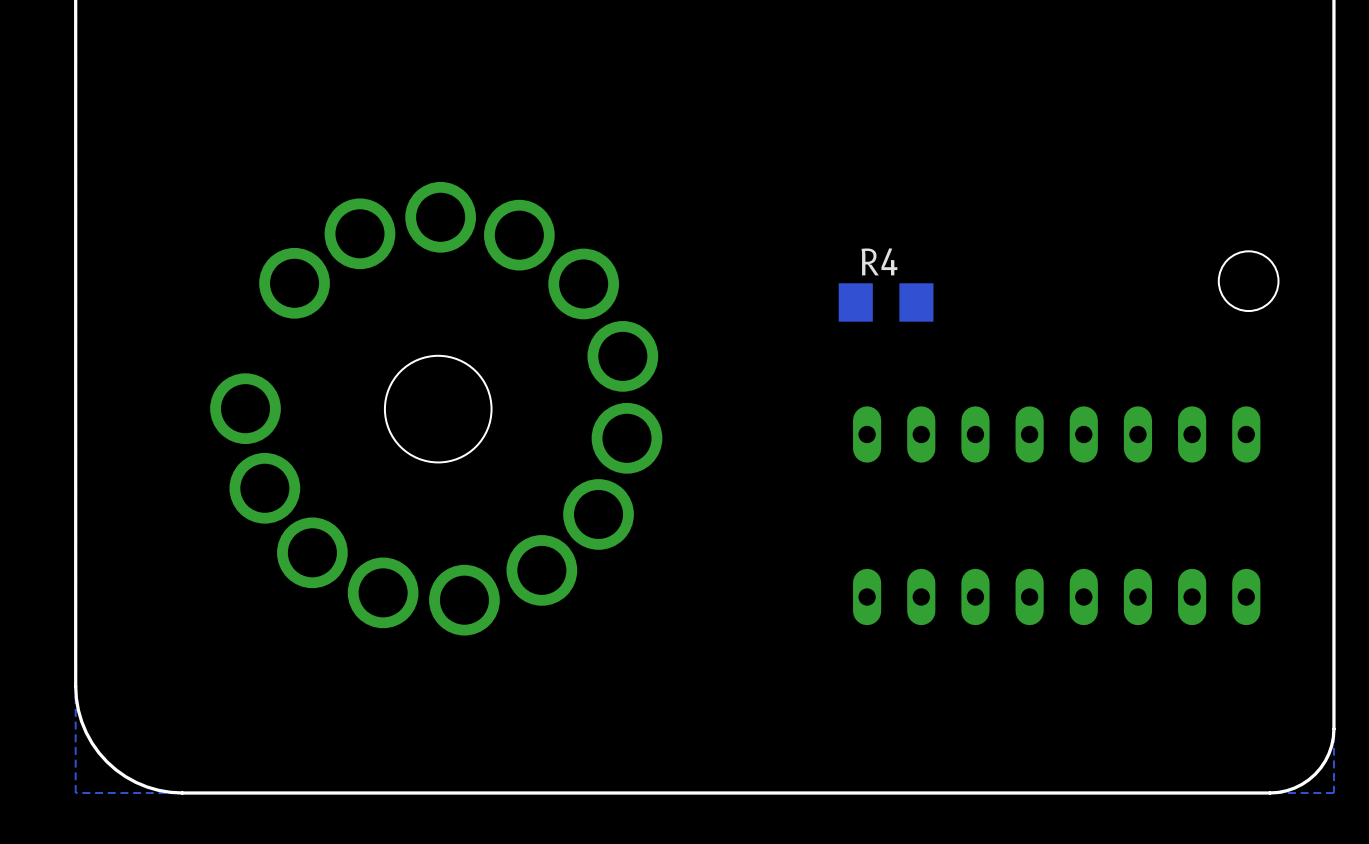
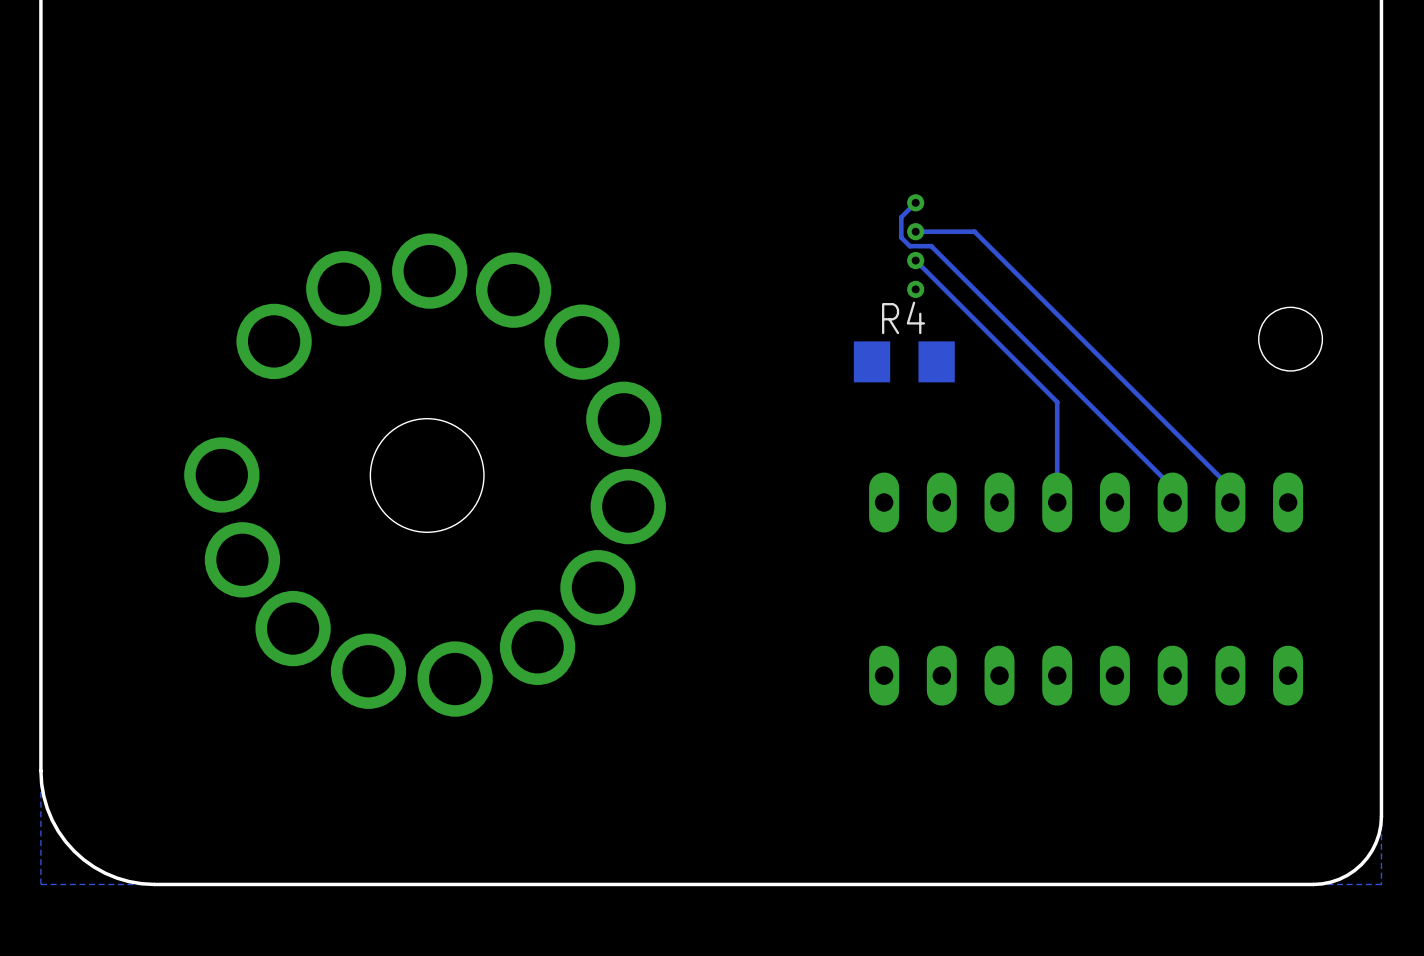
track: none -> (915, 202) (901, 217) (901, 237) (909, 246) (931, 246) (1172, 487) (1172, 502)
via: none -> (915, 202)
track: none -> (915, 231) (974, 231) (1230, 487) (1230, 502)
via: none -> (915, 231)
track: none -> (915, 260) (1057, 402) (1057, 502)
via: none -> (915, 260)
via: none -> (915, 289)

